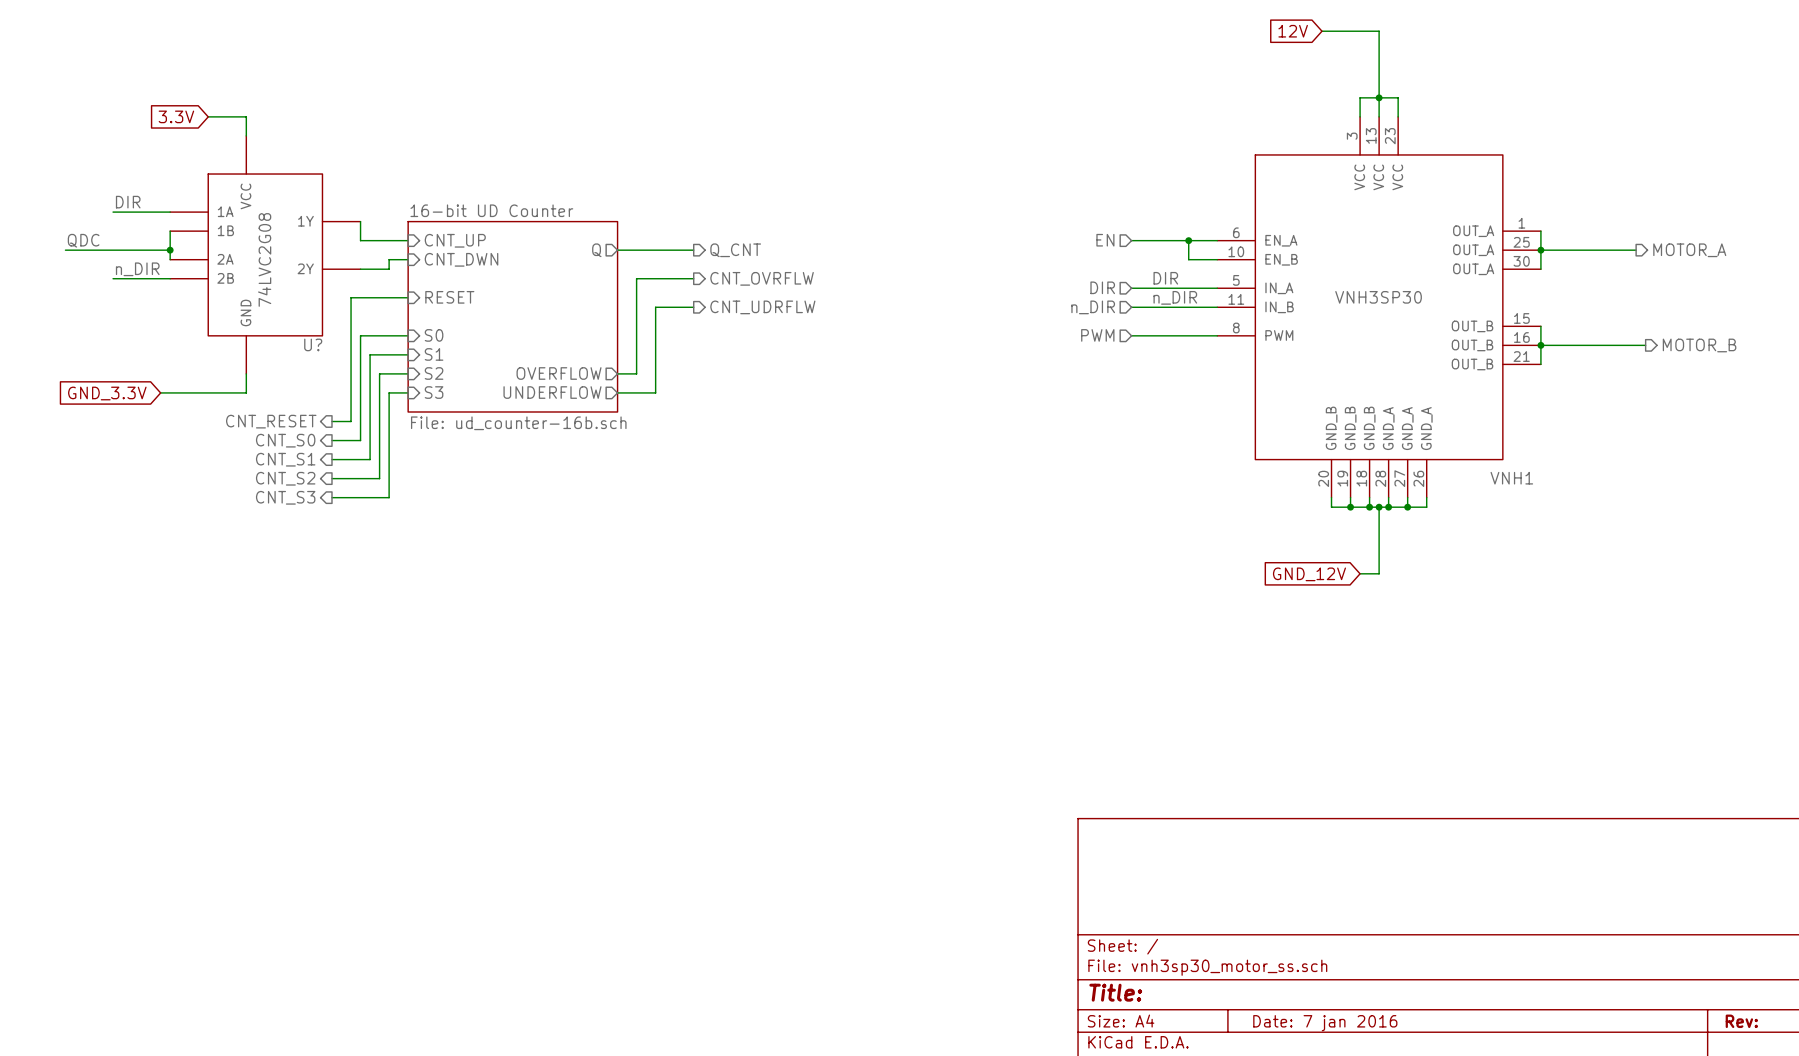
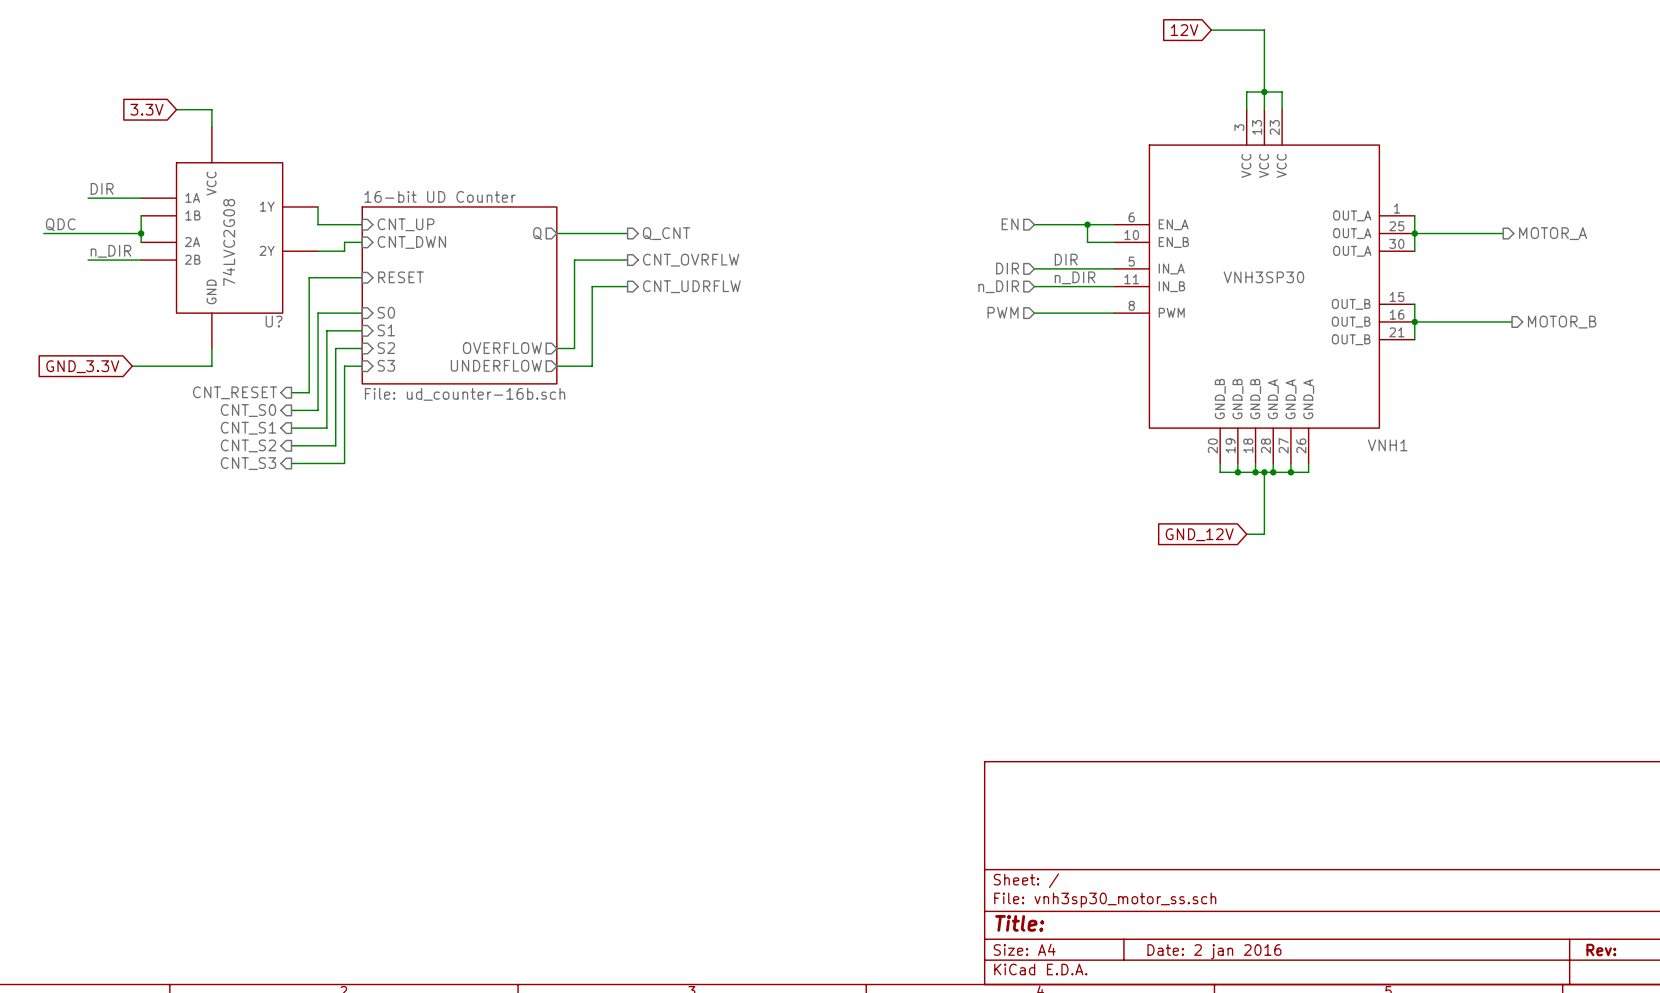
title block: Date: 7 jan 2016 (1325, 1023) -> Date: 2 jan 2016 (1214, 951)

